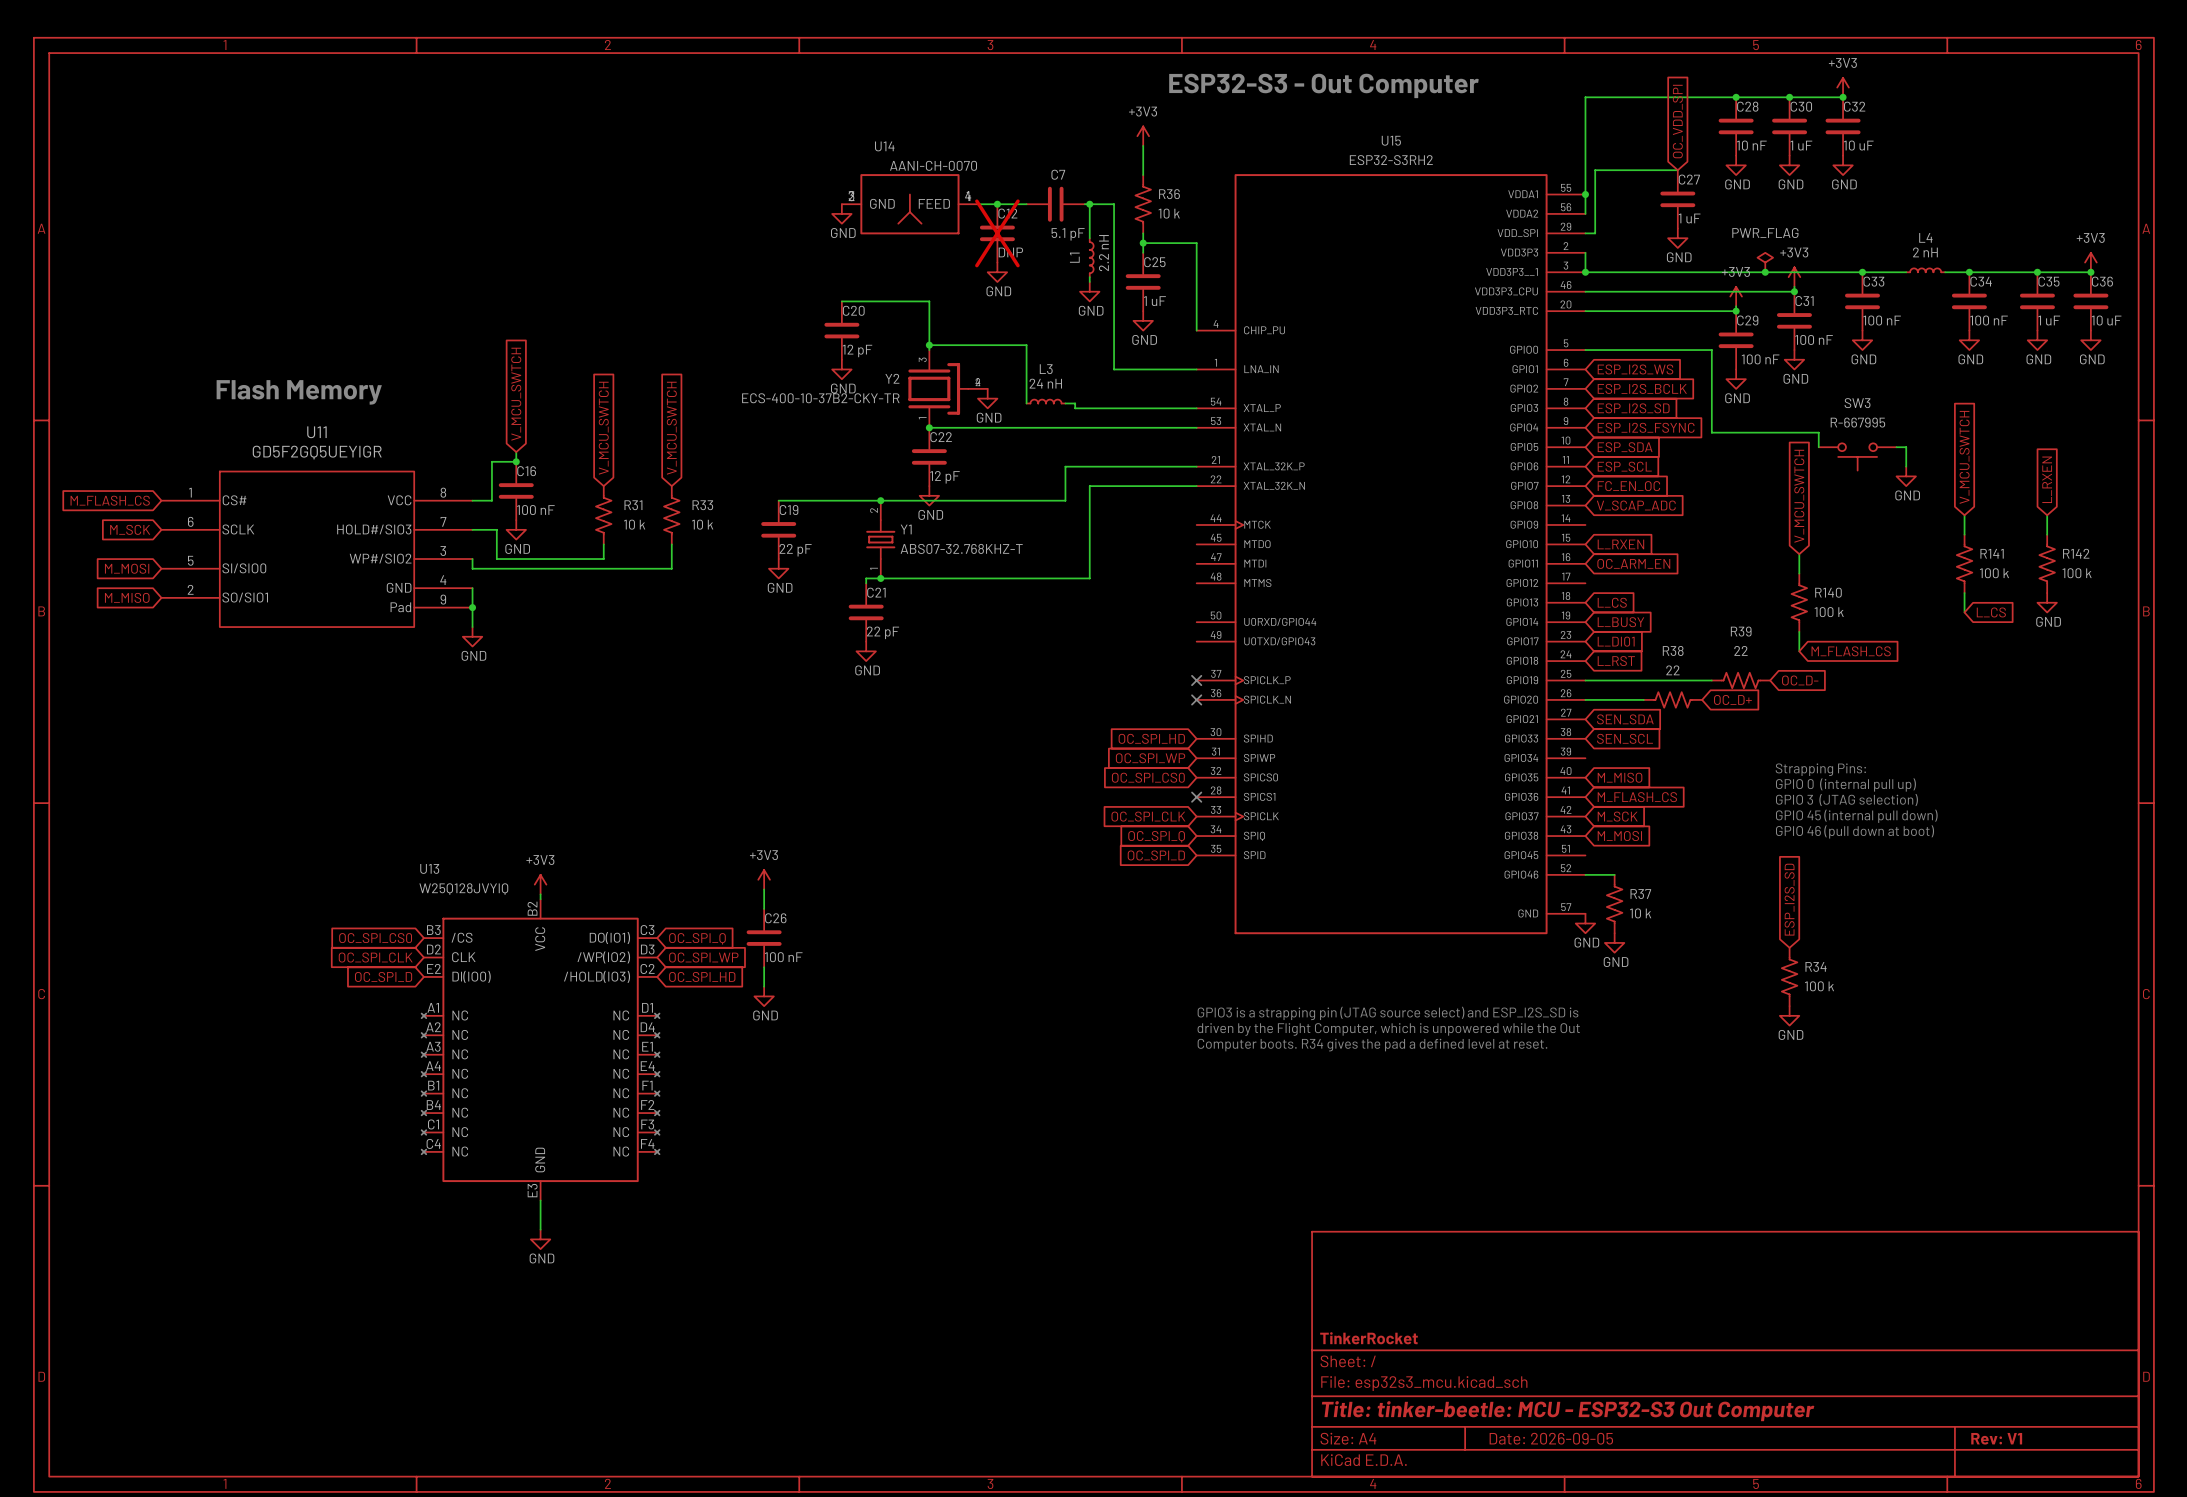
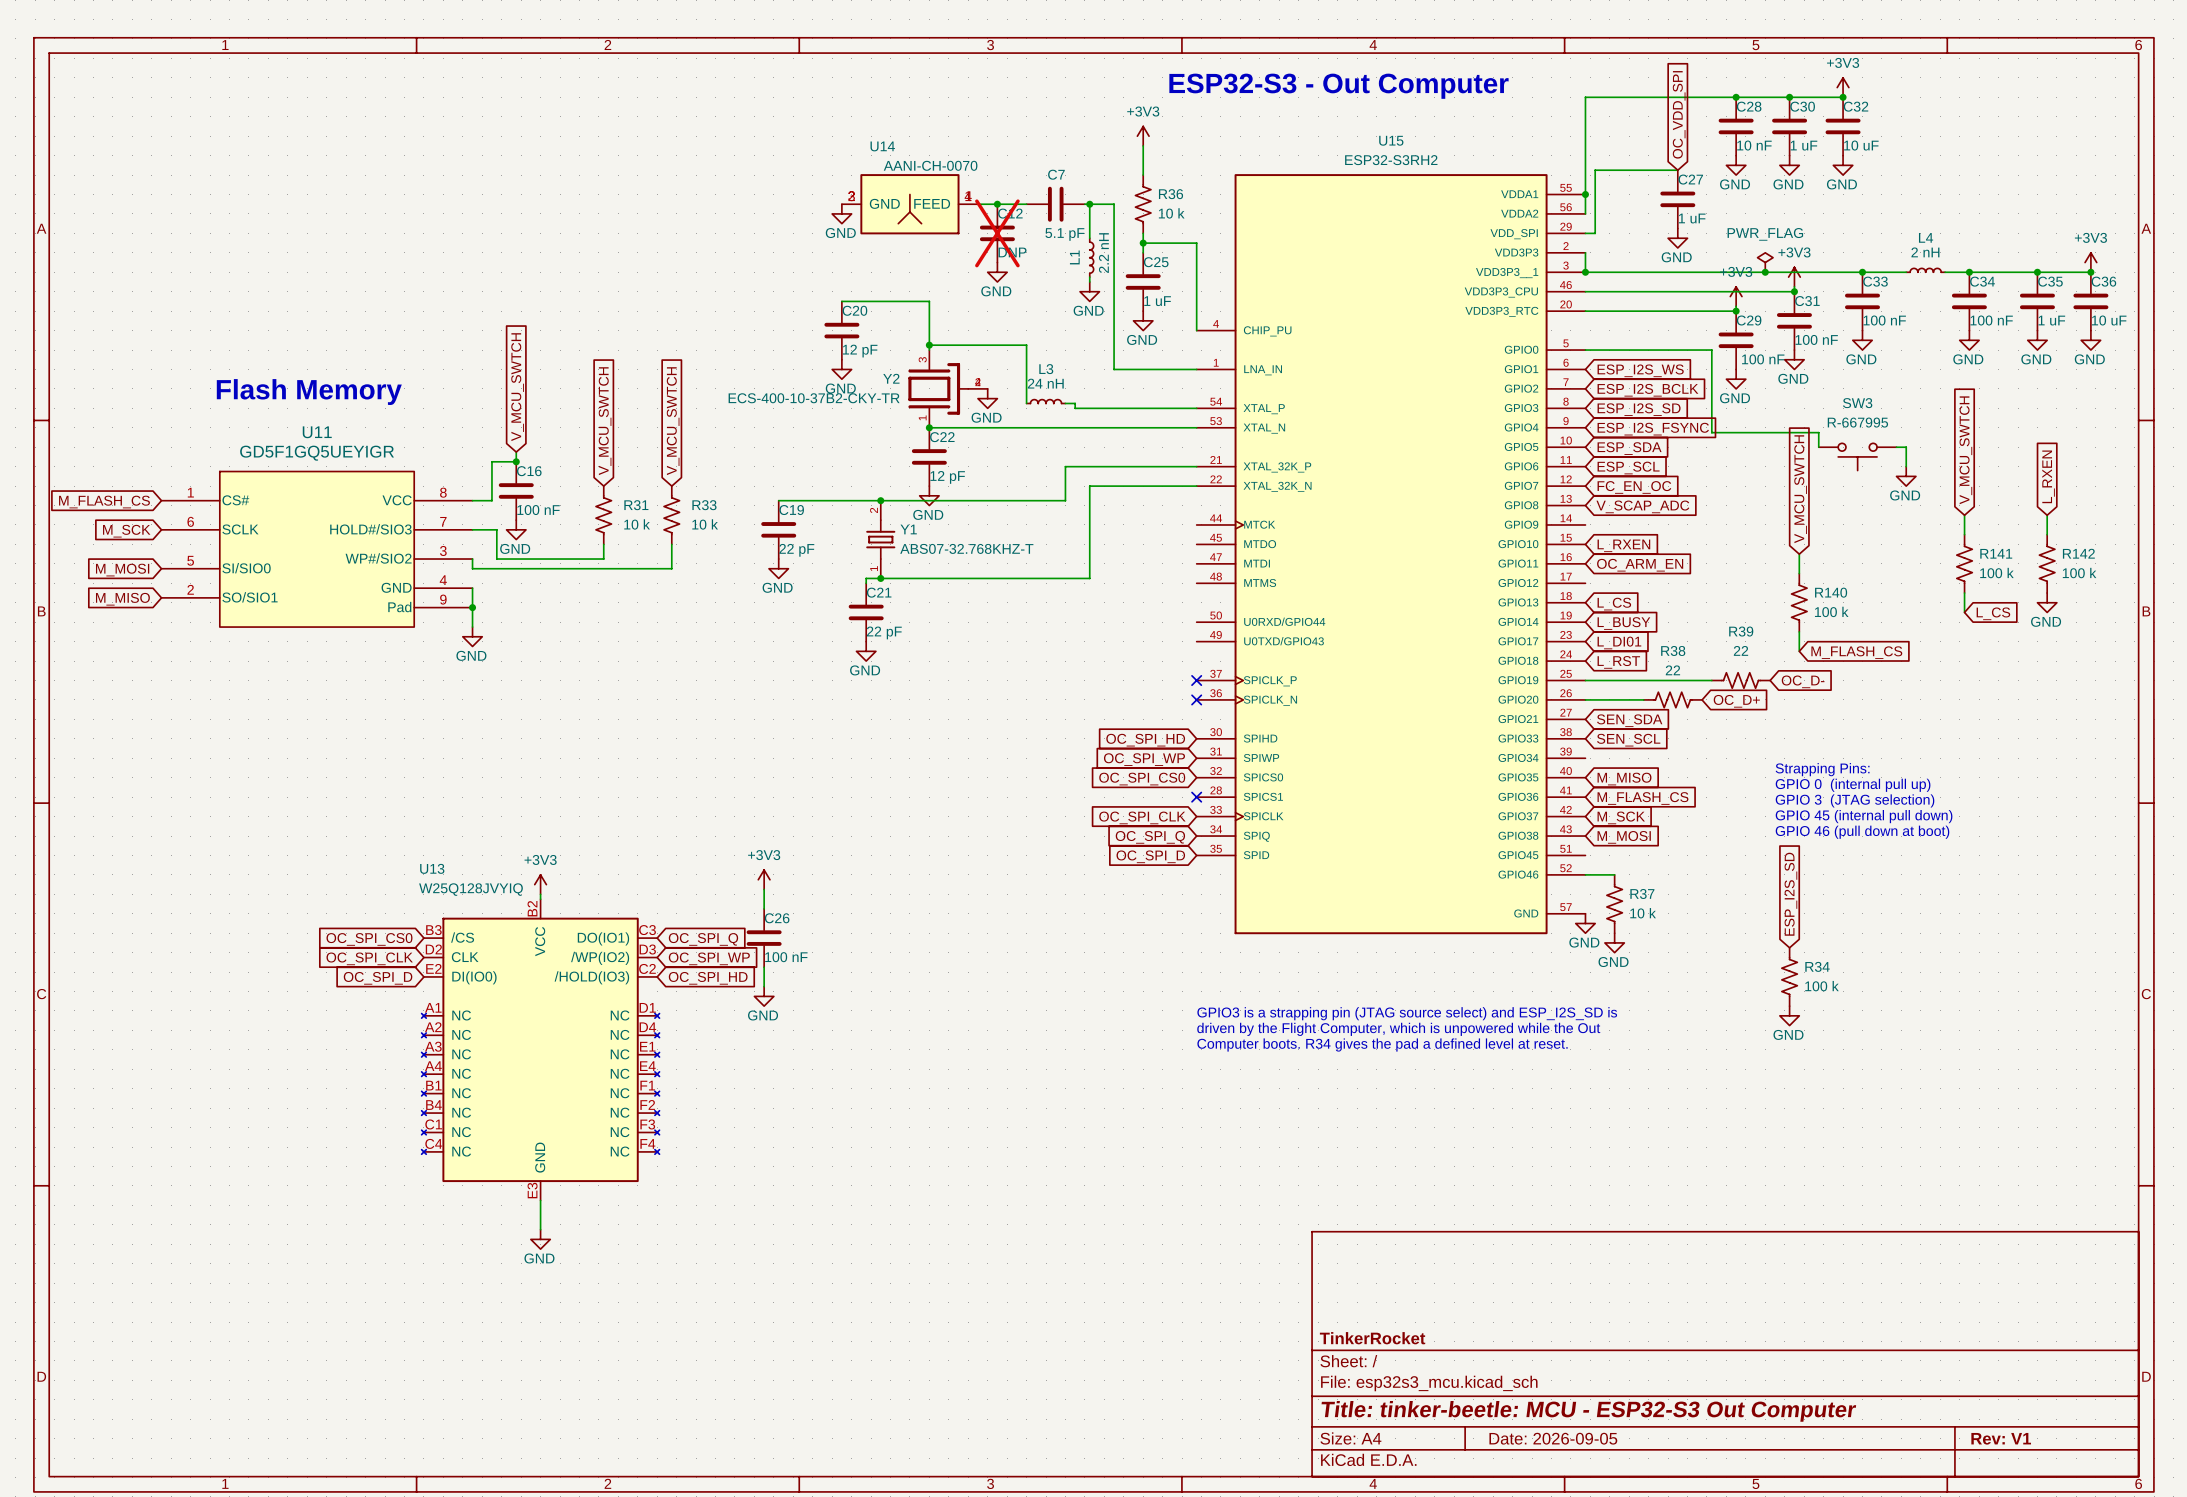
U11 value: GD5F2GQ5UEYIGR (317, 452) -> GD5F1GQ5UEYIGR (317, 453)

